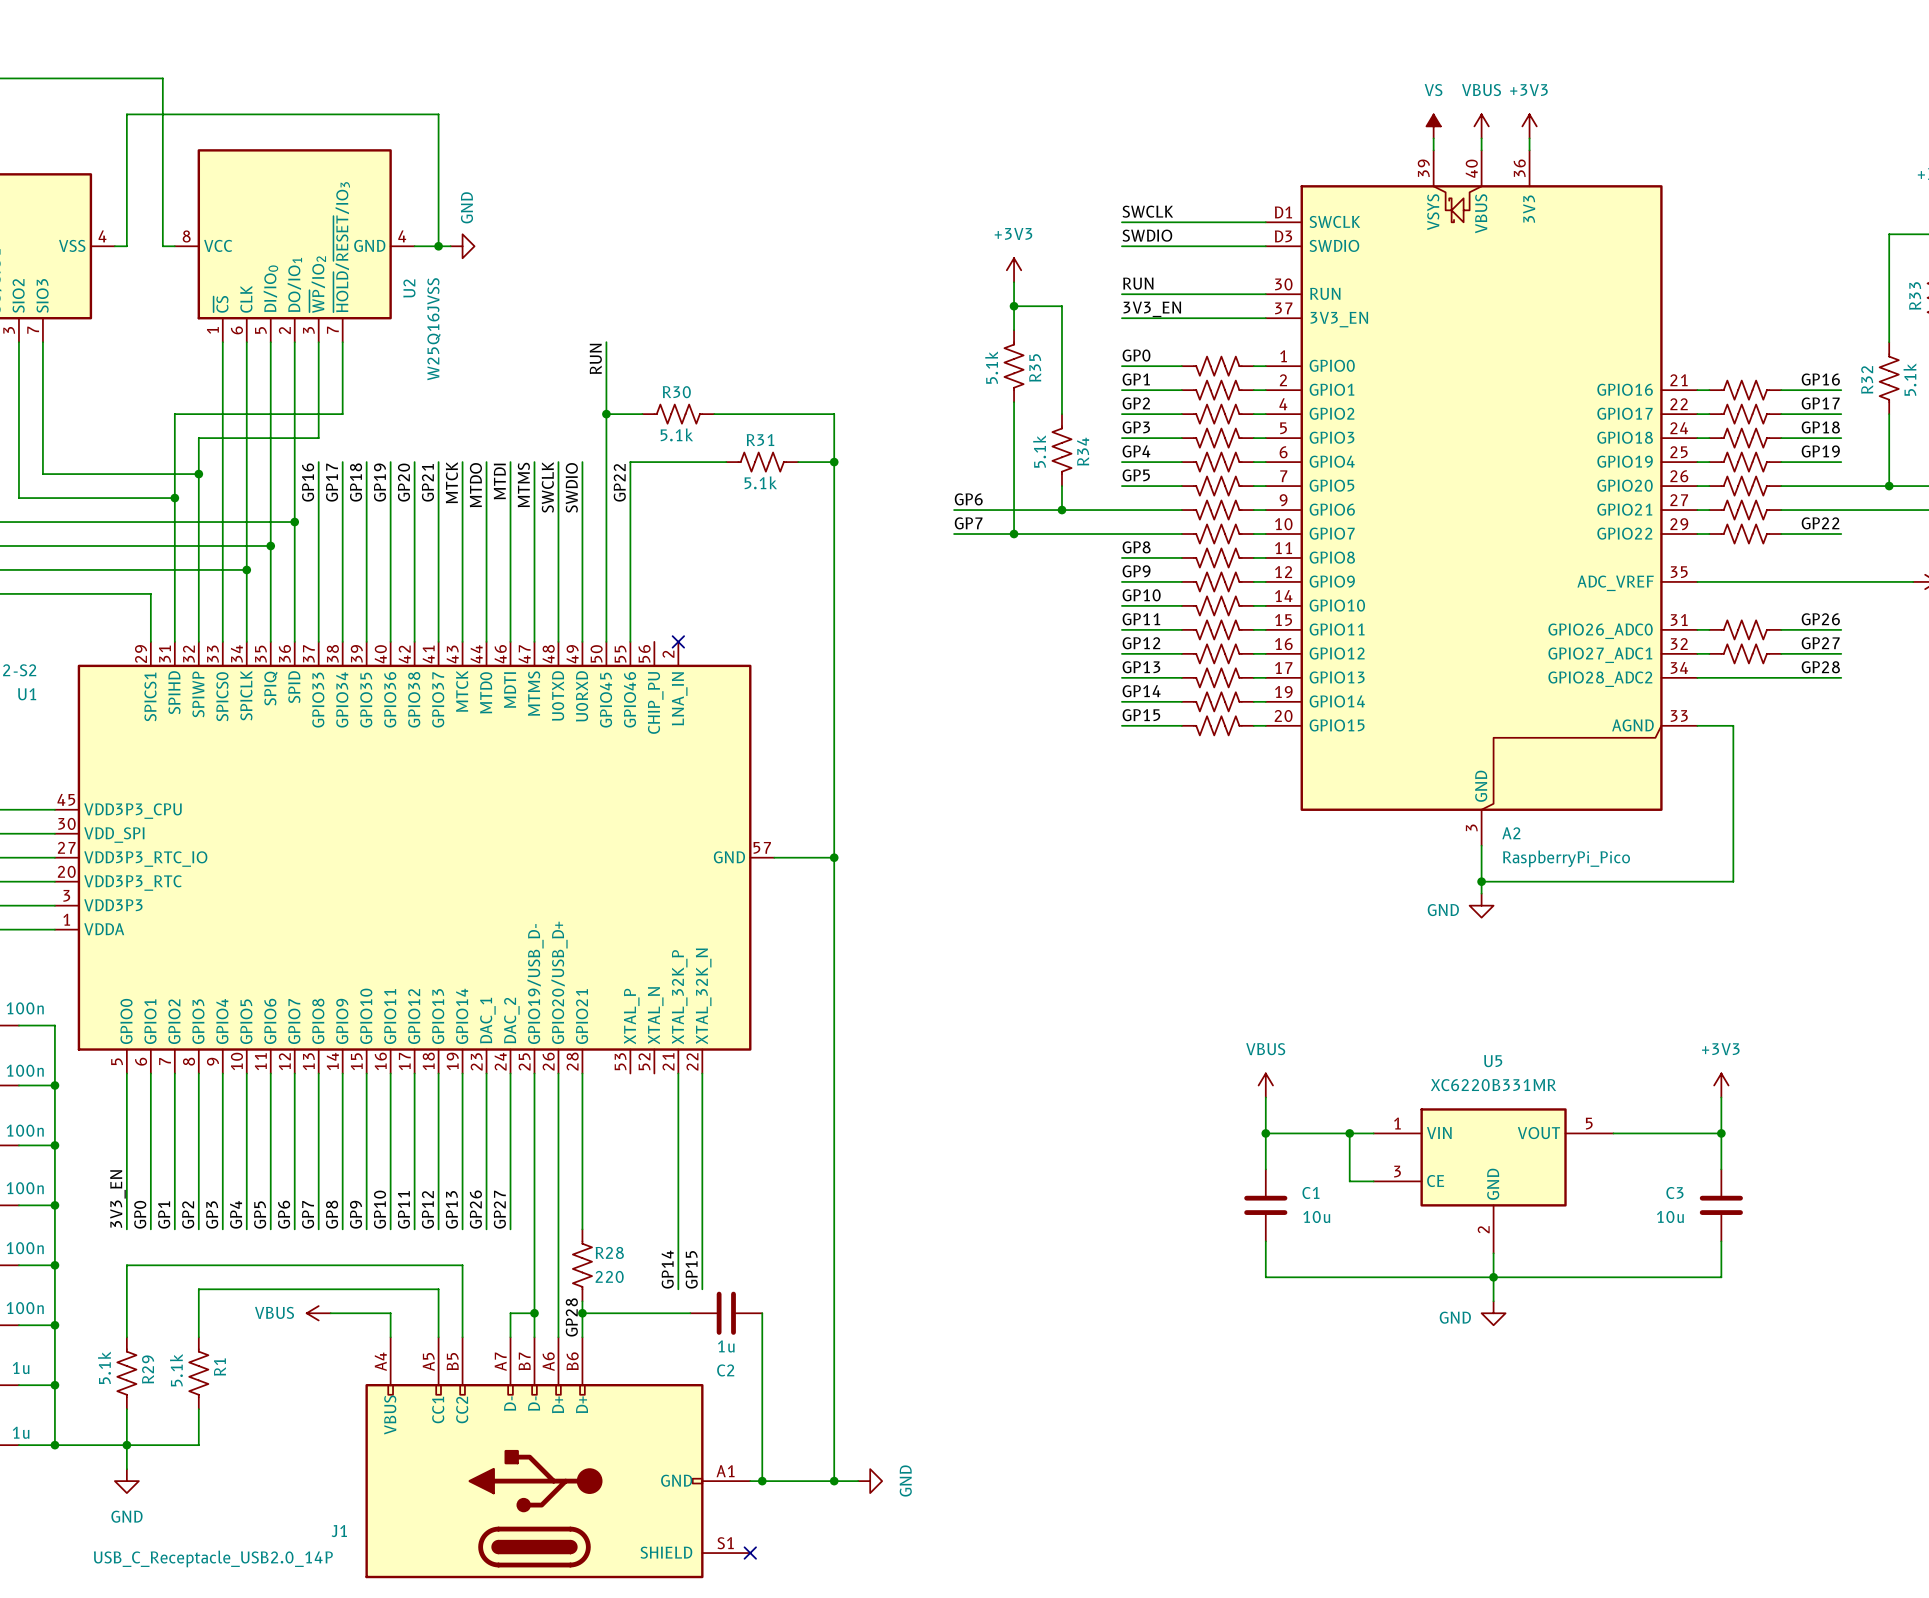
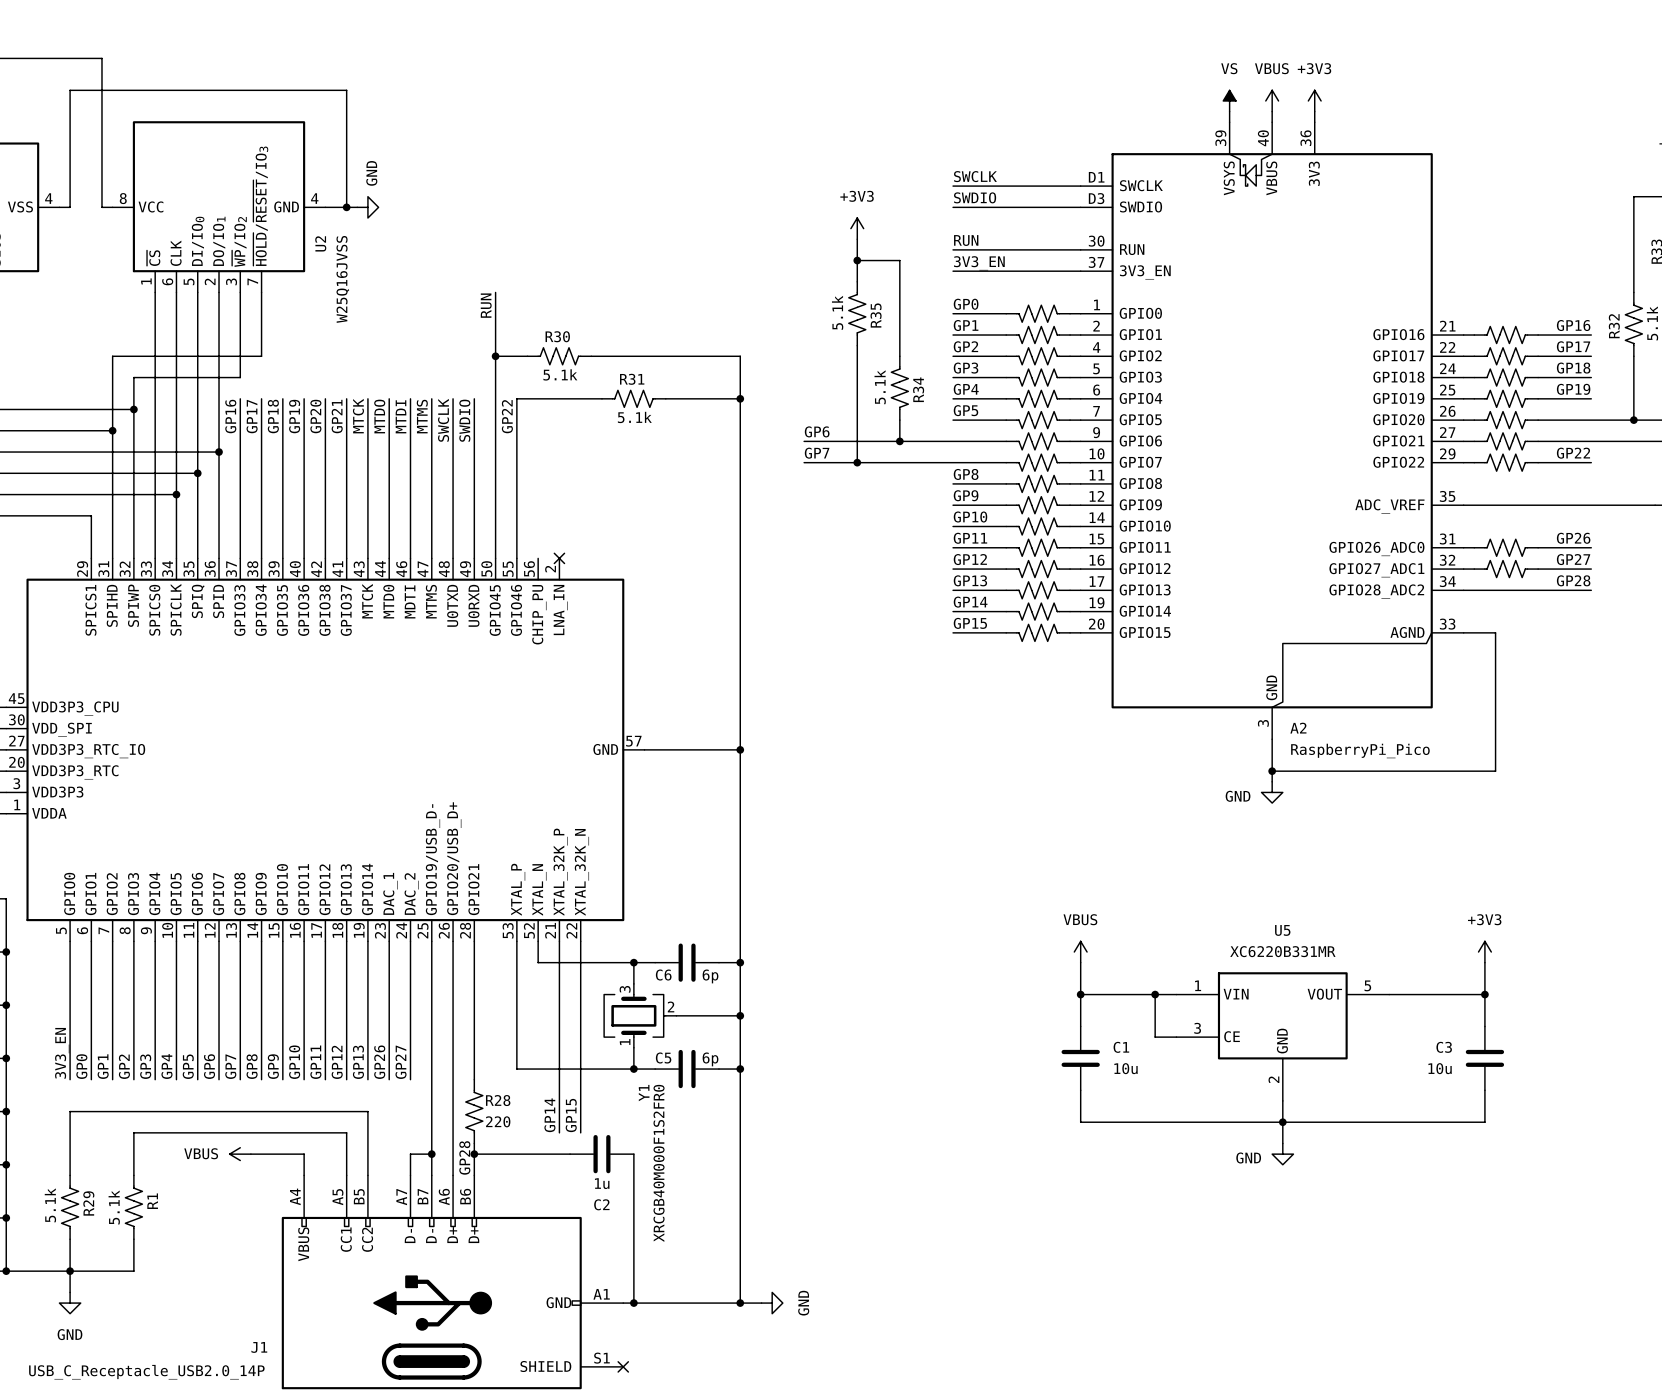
wire: (834, 414) (834, 1481) -> (697, 356) (740, 356) (740, 1303)
wire: none -> (697, 398) (740, 398)
junction position: (834, 462) -> (740, 398)
wire: none -> (697, 749) (740, 749)
junction position: (834, 857) -> (740, 749)
wire: none -> (516, 941) (516, 1069) (655, 1069)
wire: none -> (538, 941) (538, 962) (655, 962)
wire: none -> (633, 962) (633, 983)
junction: none -> (633, 962)
C6: none -> 6p (687, 962)
wire: none -> (718, 962) (740, 962)
junction: none -> (740, 962)
Y1: none -> XRCGB40M000F1S2FR0 (640, 1015)
wire: none -> (676, 1015) (740, 1015)
junction: none -> (740, 1015)
wire: none -> (633, 1047) (633, 1069)
junction: none -> (633, 1069)
C5: none -> 6p (687, 1069)
wire: none -> (718, 1069) (740, 1069)
junction: none -> (740, 1069)
junction position: (834, 1481) -> (740, 1303)
wire: none -> (718, 1303) (761, 1303)
power symbol position: GND (870, 1481) -> GND (772, 1303)

